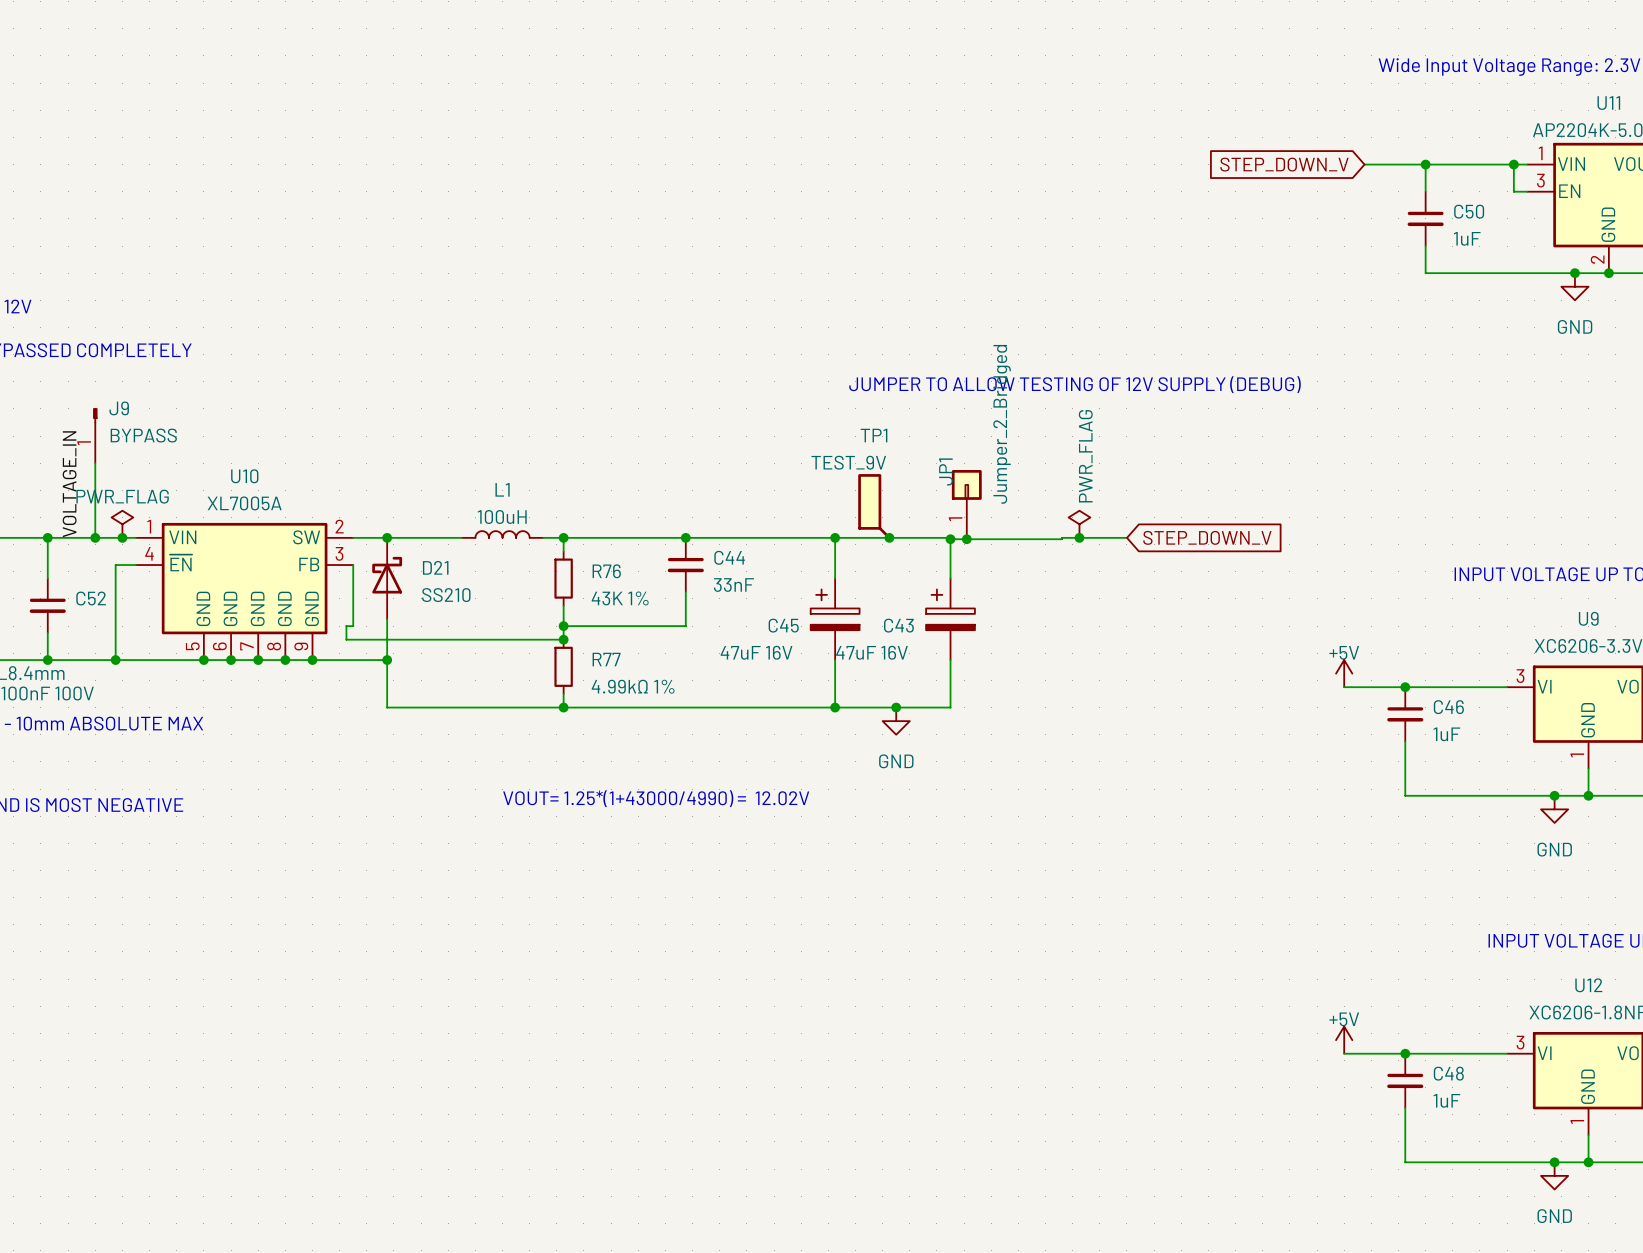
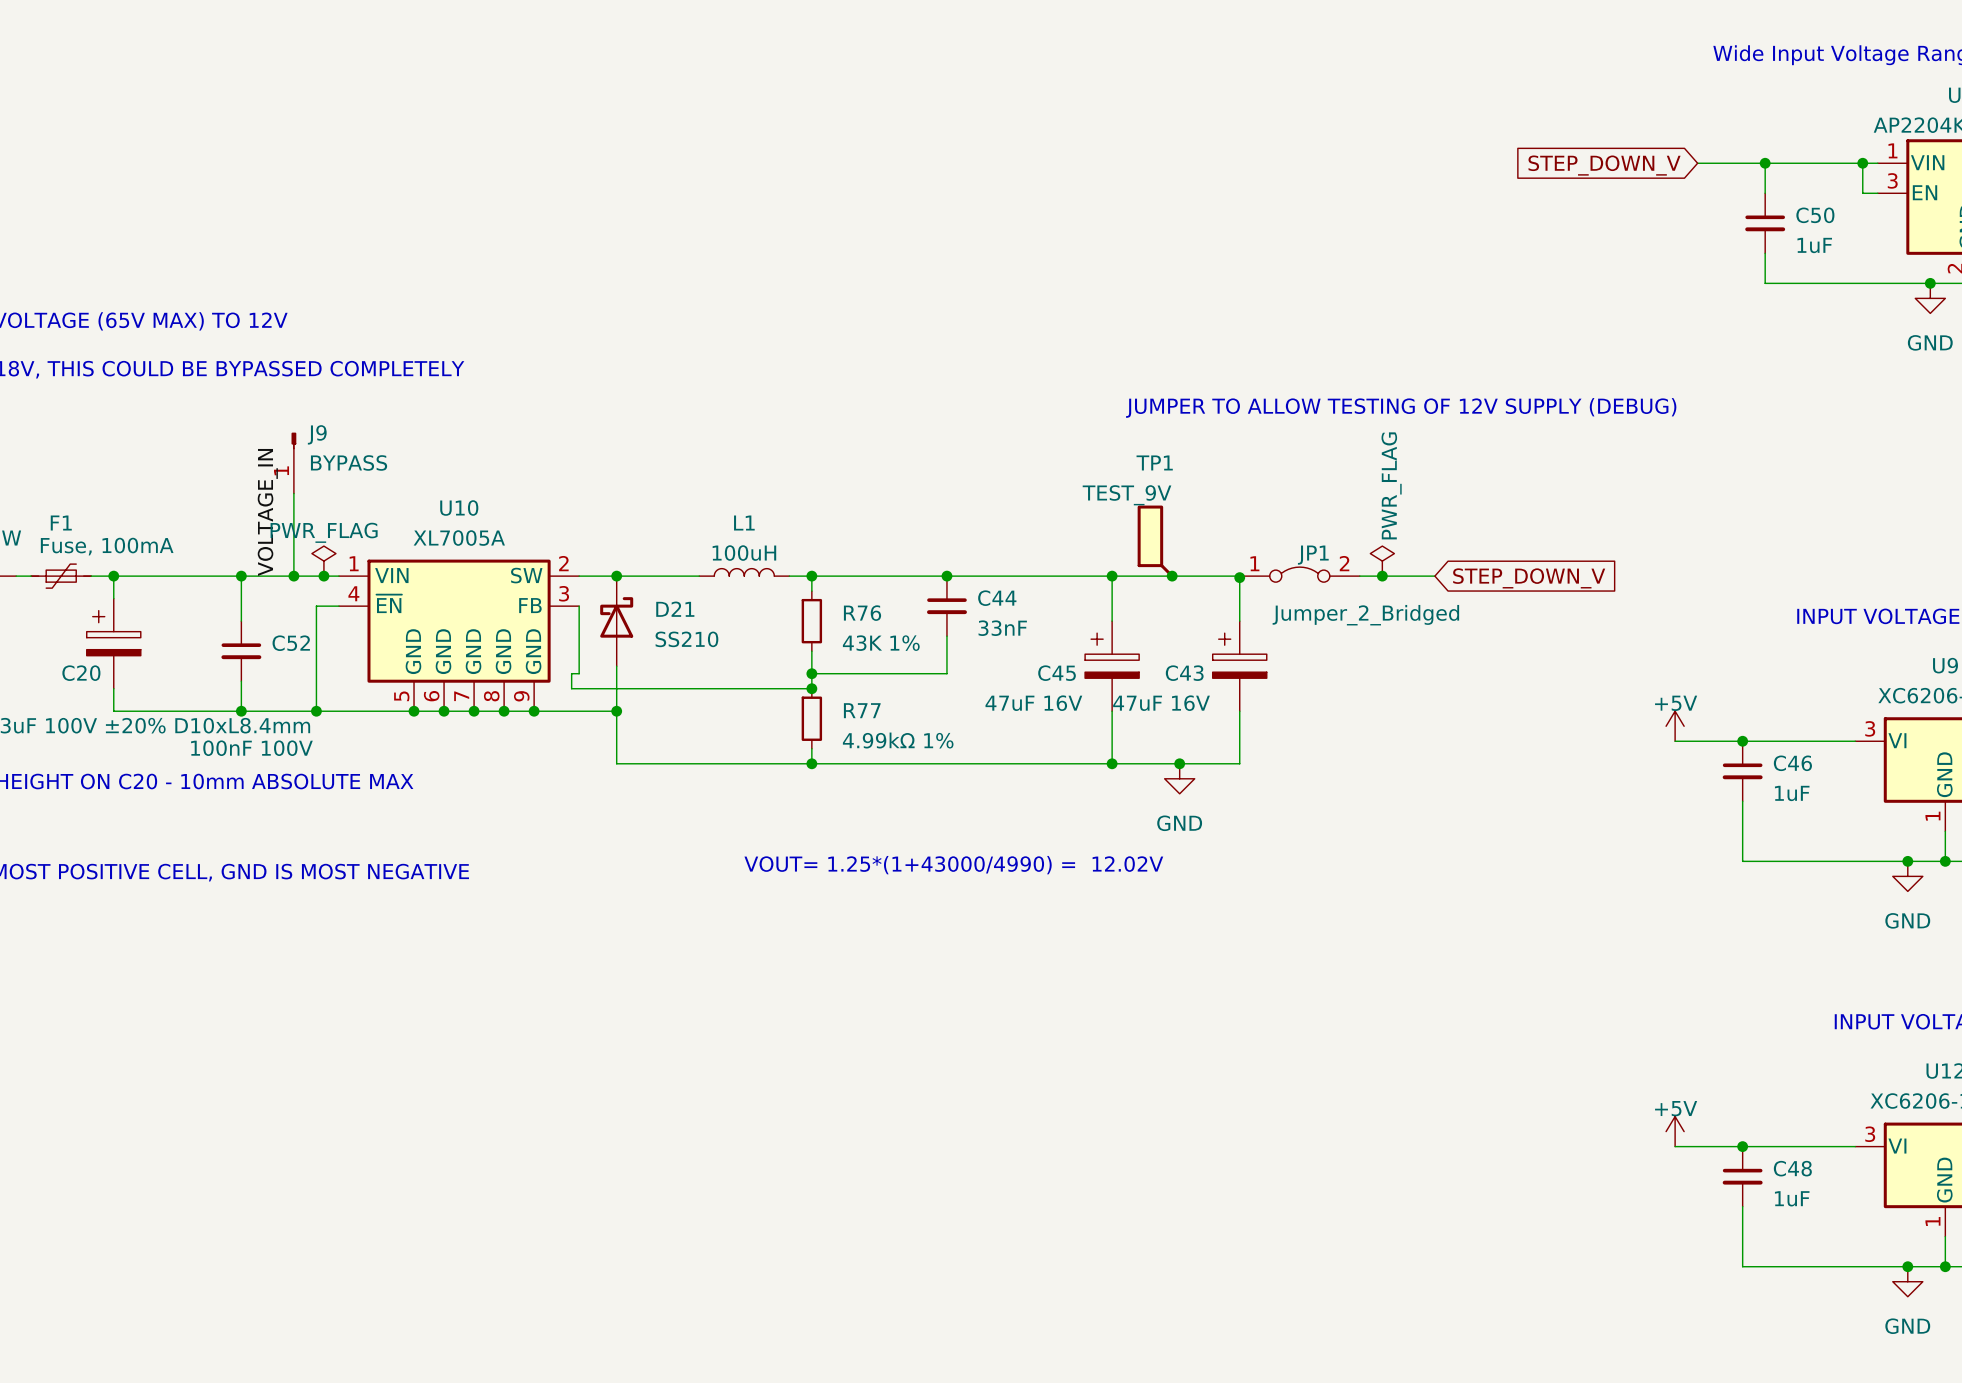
JP1 value position: Jumper_2_Bridged (1002, 424) -> Jumper_2_Bridged (1365, 615)
JP1 symbol: [951, 469, 982, 540] -> [1239, 567, 1360, 583]
JP1 name position: JP1 (946, 471) -> JP1 (1313, 555)
wire: (1061, 537) (950, 539) -> (1362, 576) (1359, 576)
junction: (966, 539) -> none

